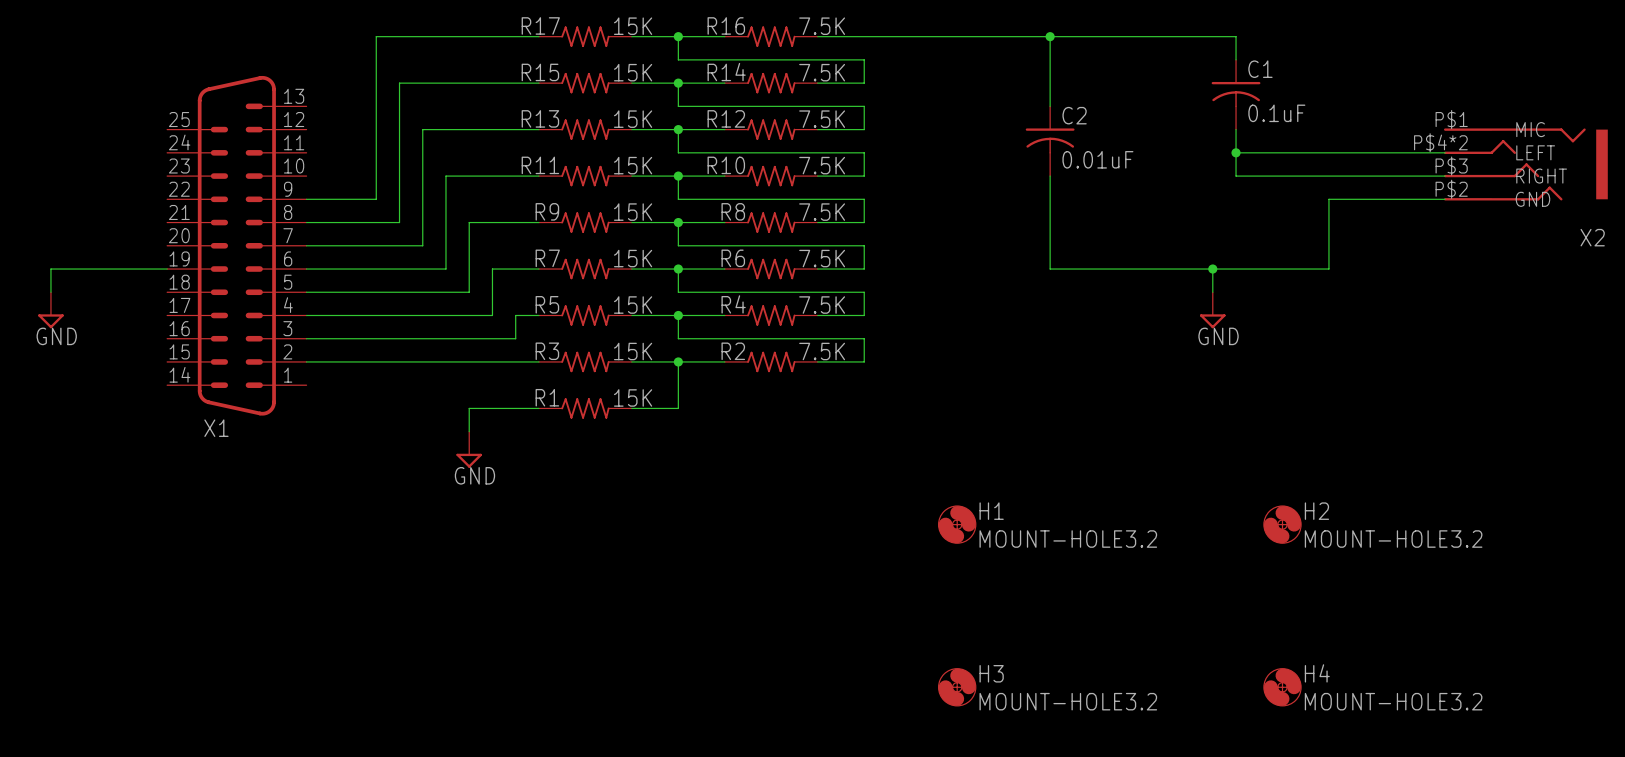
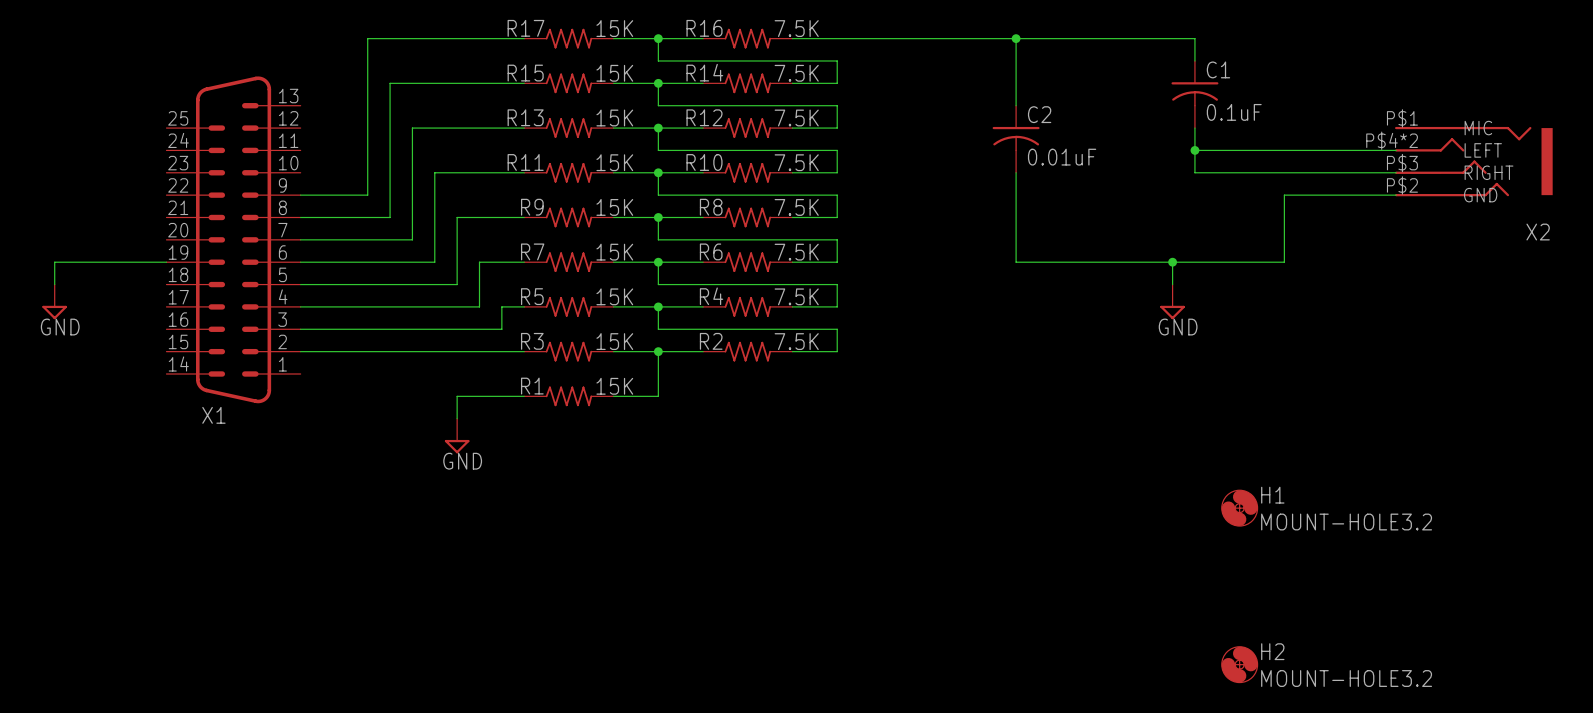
H2 name: H2 (1316, 511) -> H1 (1272, 495)
H1: MOUNT-HOLE3.2 (957, 524) -> none
H4 name: H4 (1317, 673) -> H2 (1272, 651)
H3: MOUNT-HOLE3.2 (957, 687) -> none

